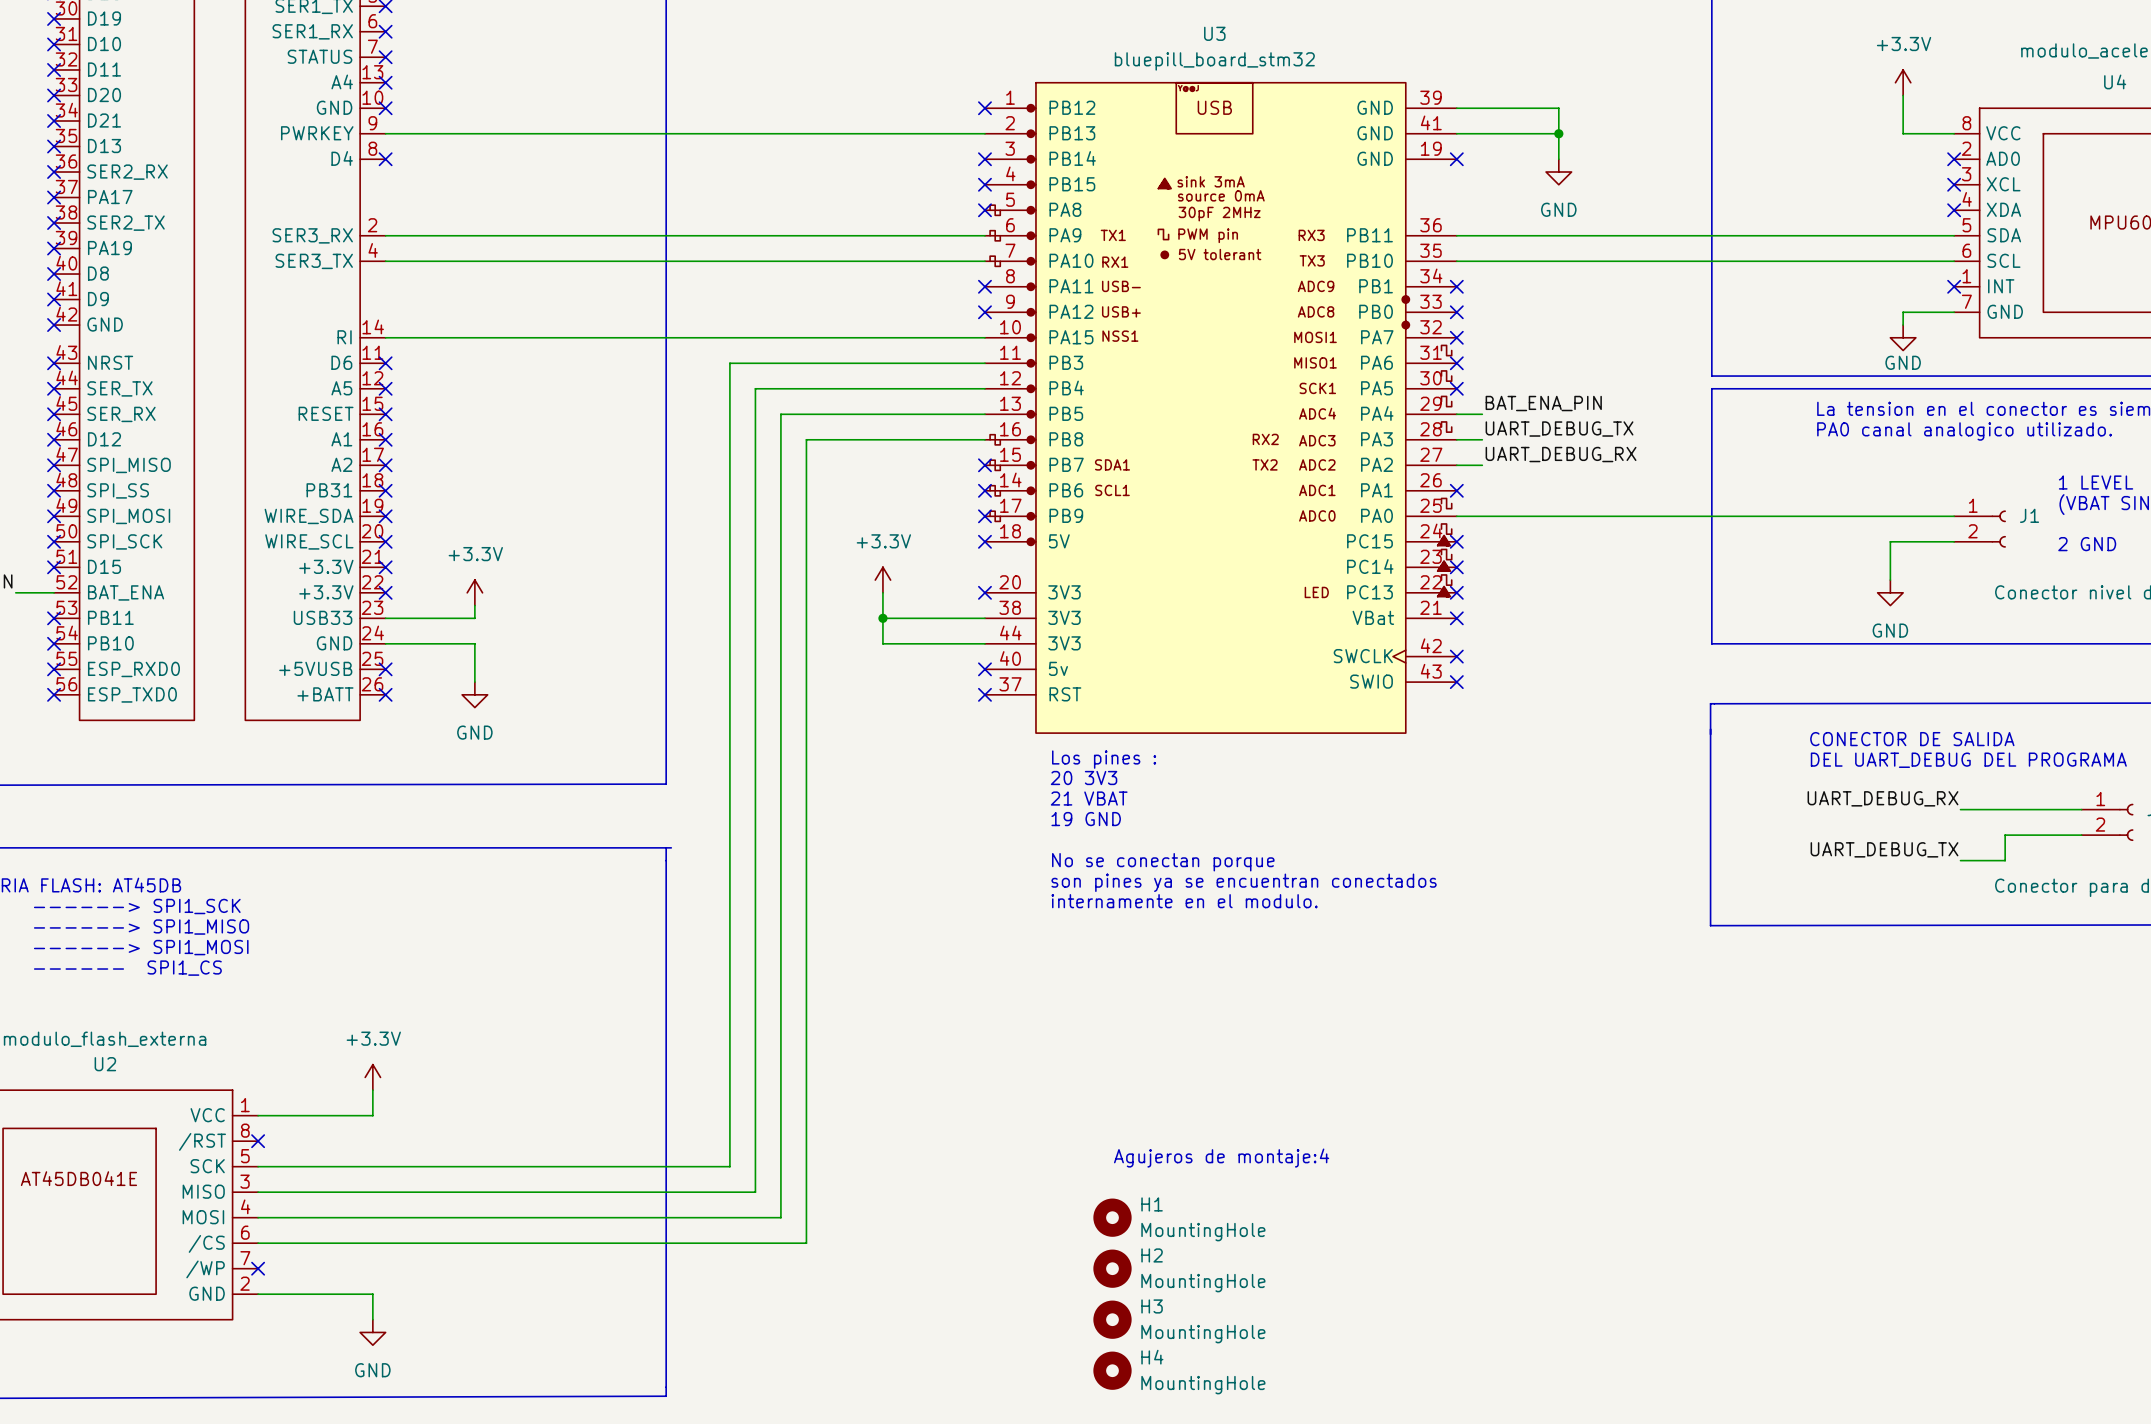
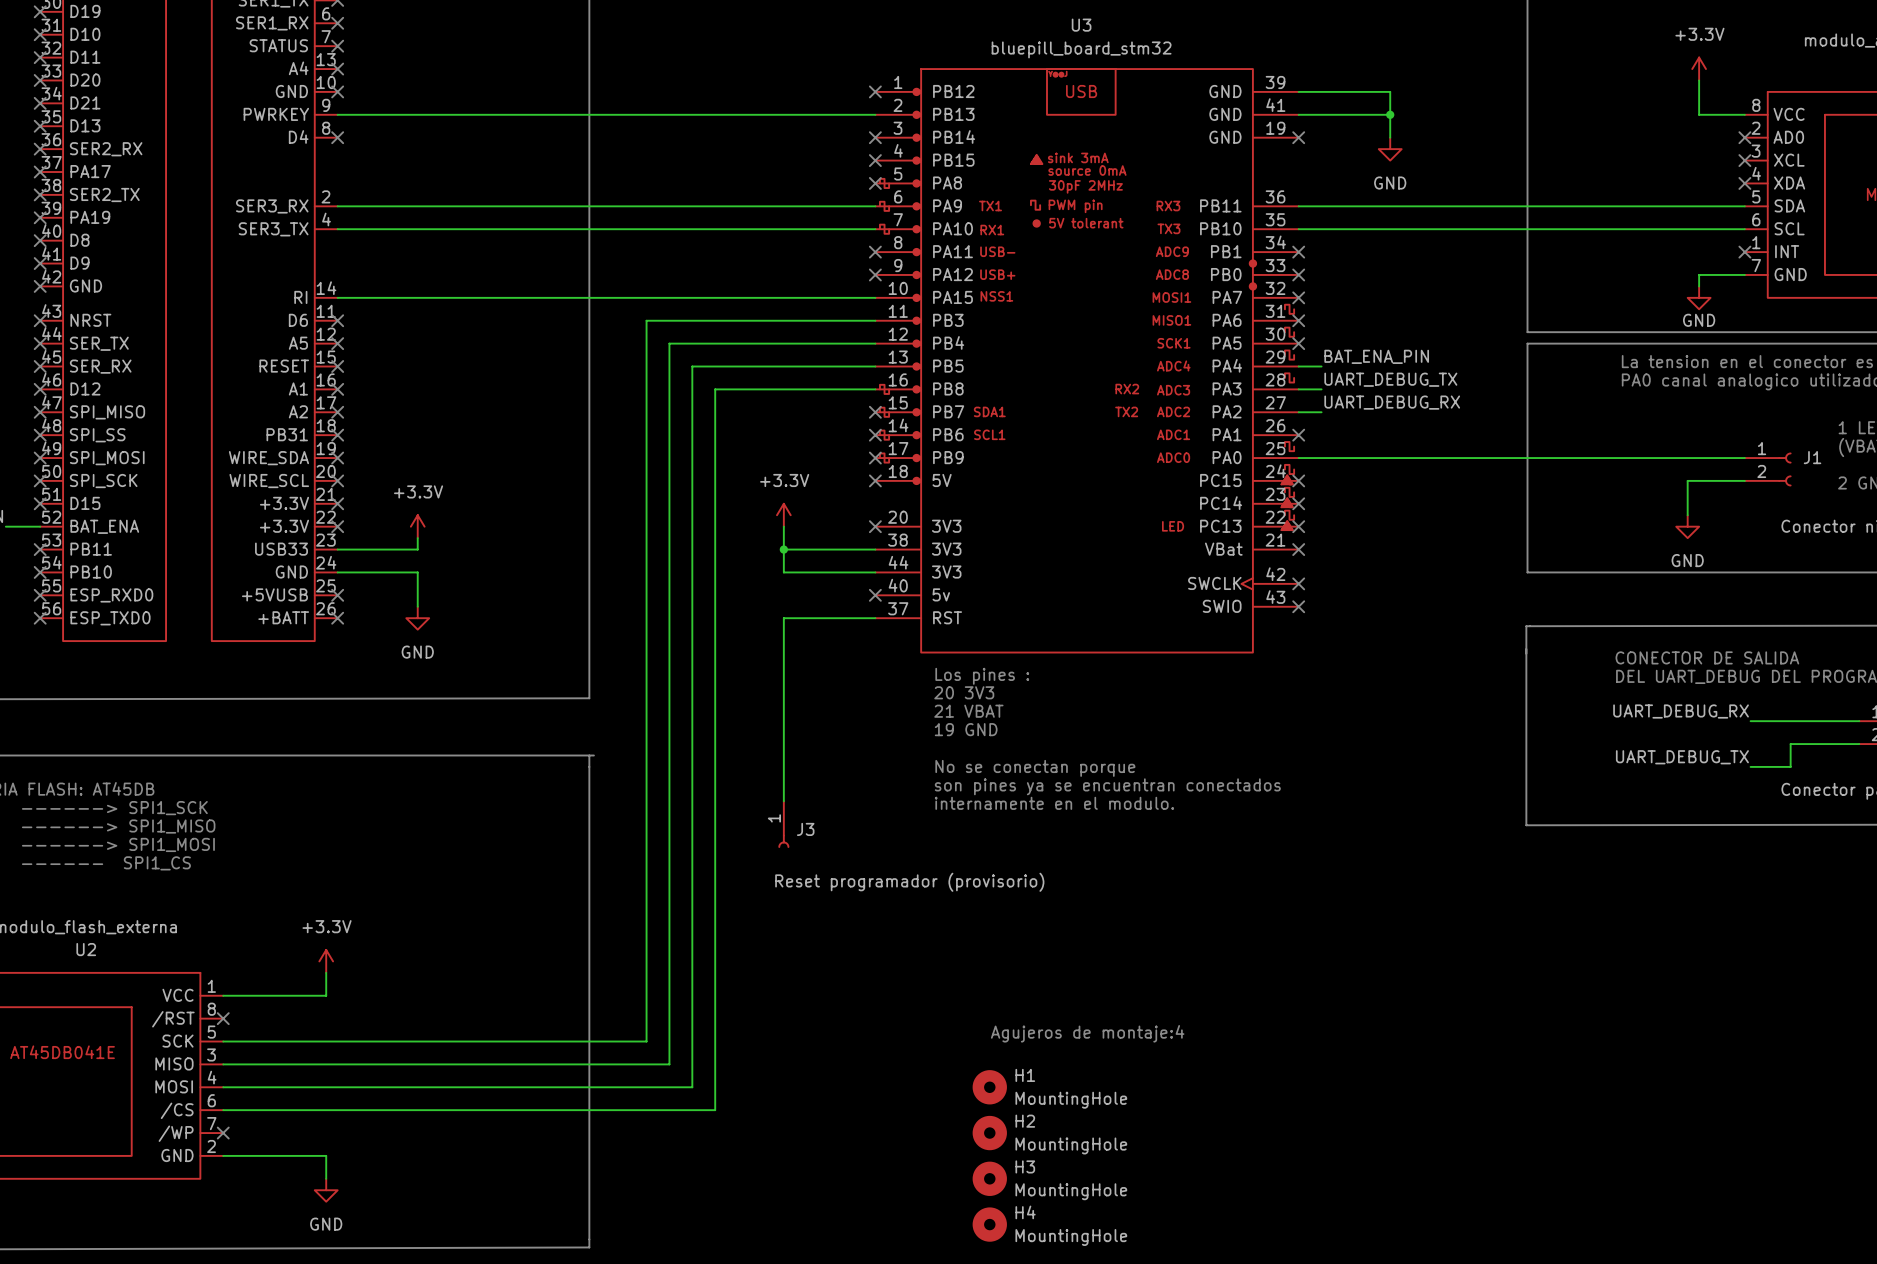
wire: none -> (875, 618) (783, 618) (783, 801)
no-connect mark: (984, 694) -> none
J3: none -> Reset programador (provisorio) (783, 824)

